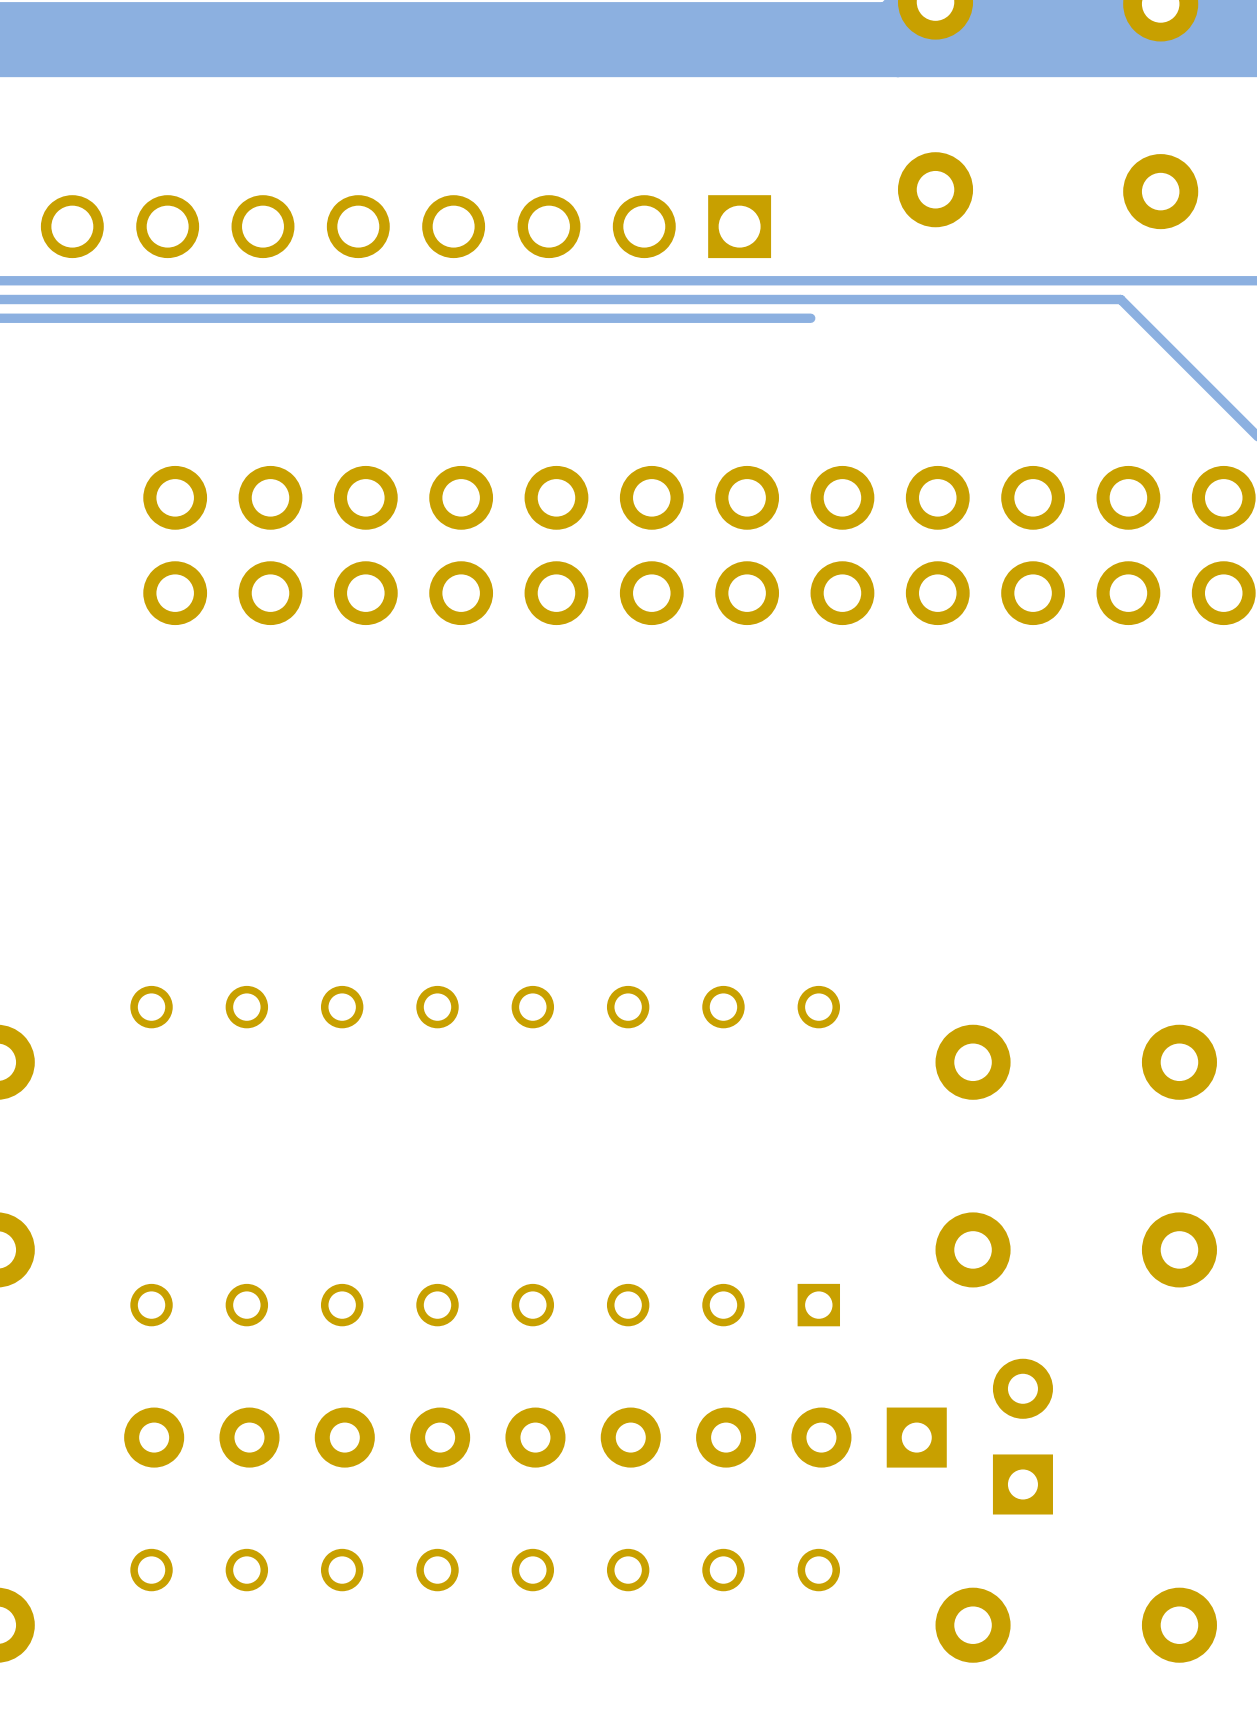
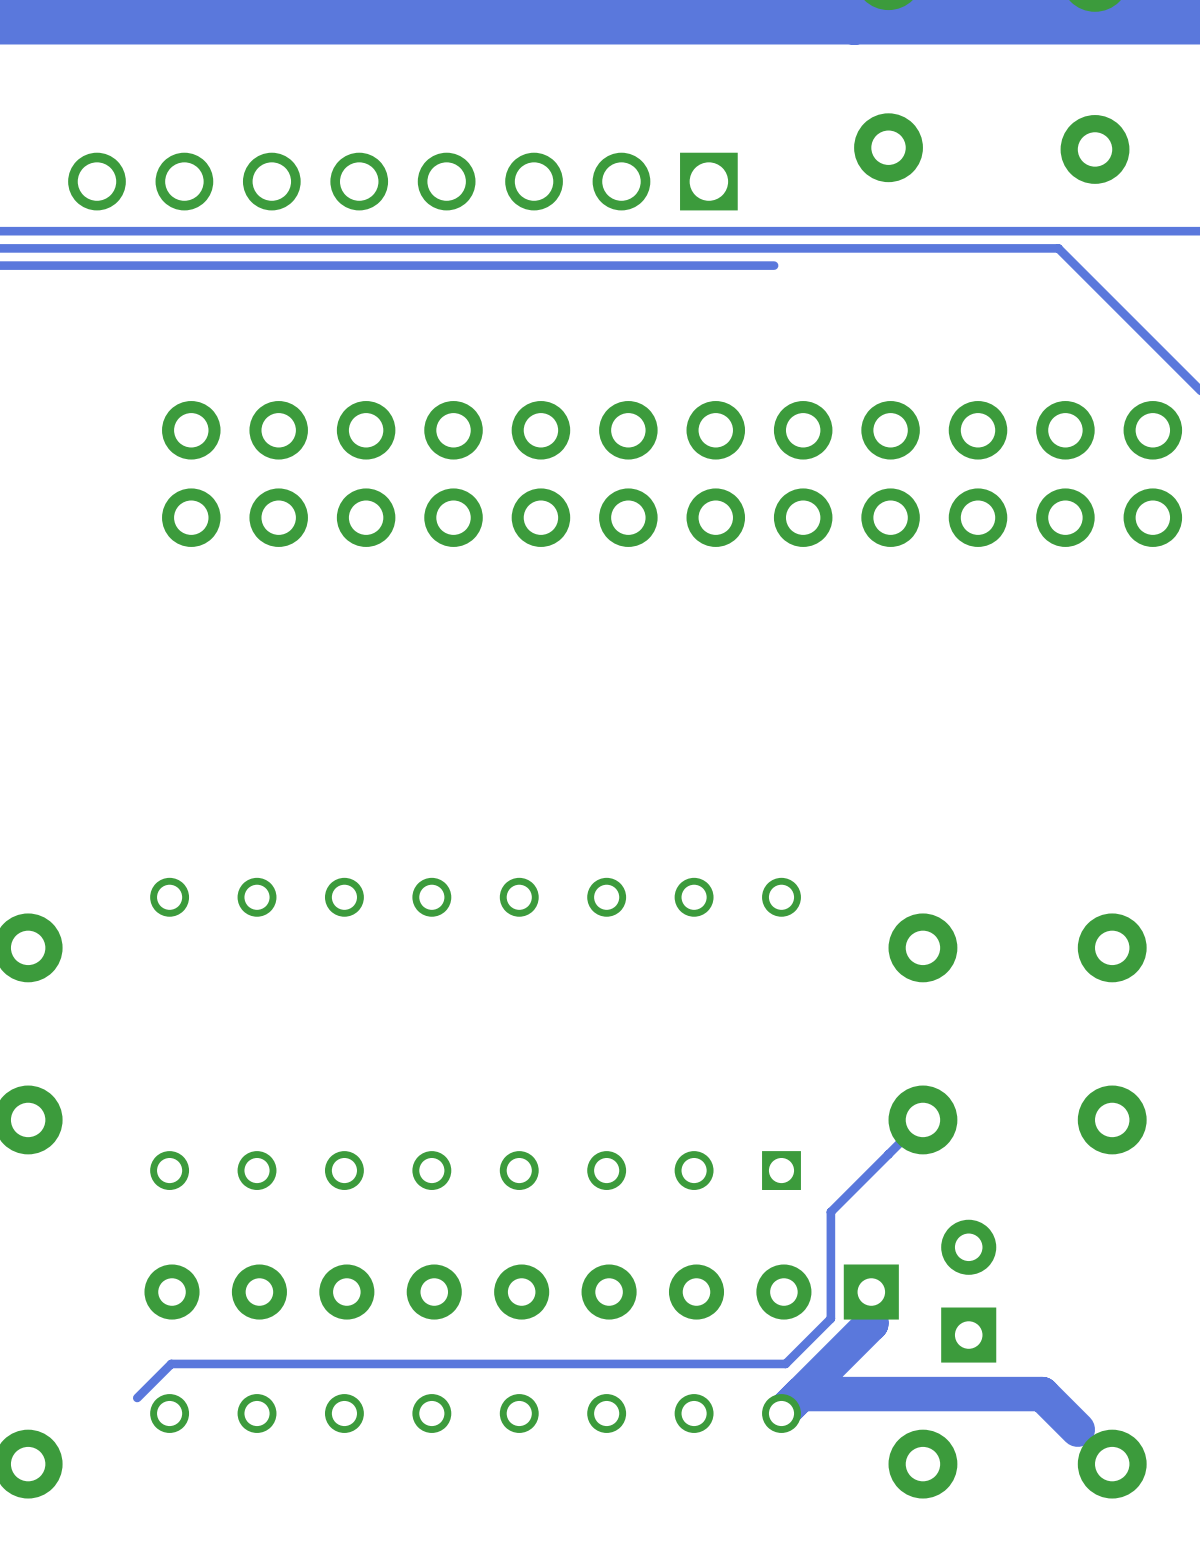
track: none -> (922, 1119) (830, 1212) (830, 1318) (785, 1363) (171, 1363) (137, 1397)
track: none -> (871, 1292) (871, 1323) (781, 1413)
track: none -> (800, 1394) (1042, 1394) (1077, 1429)

